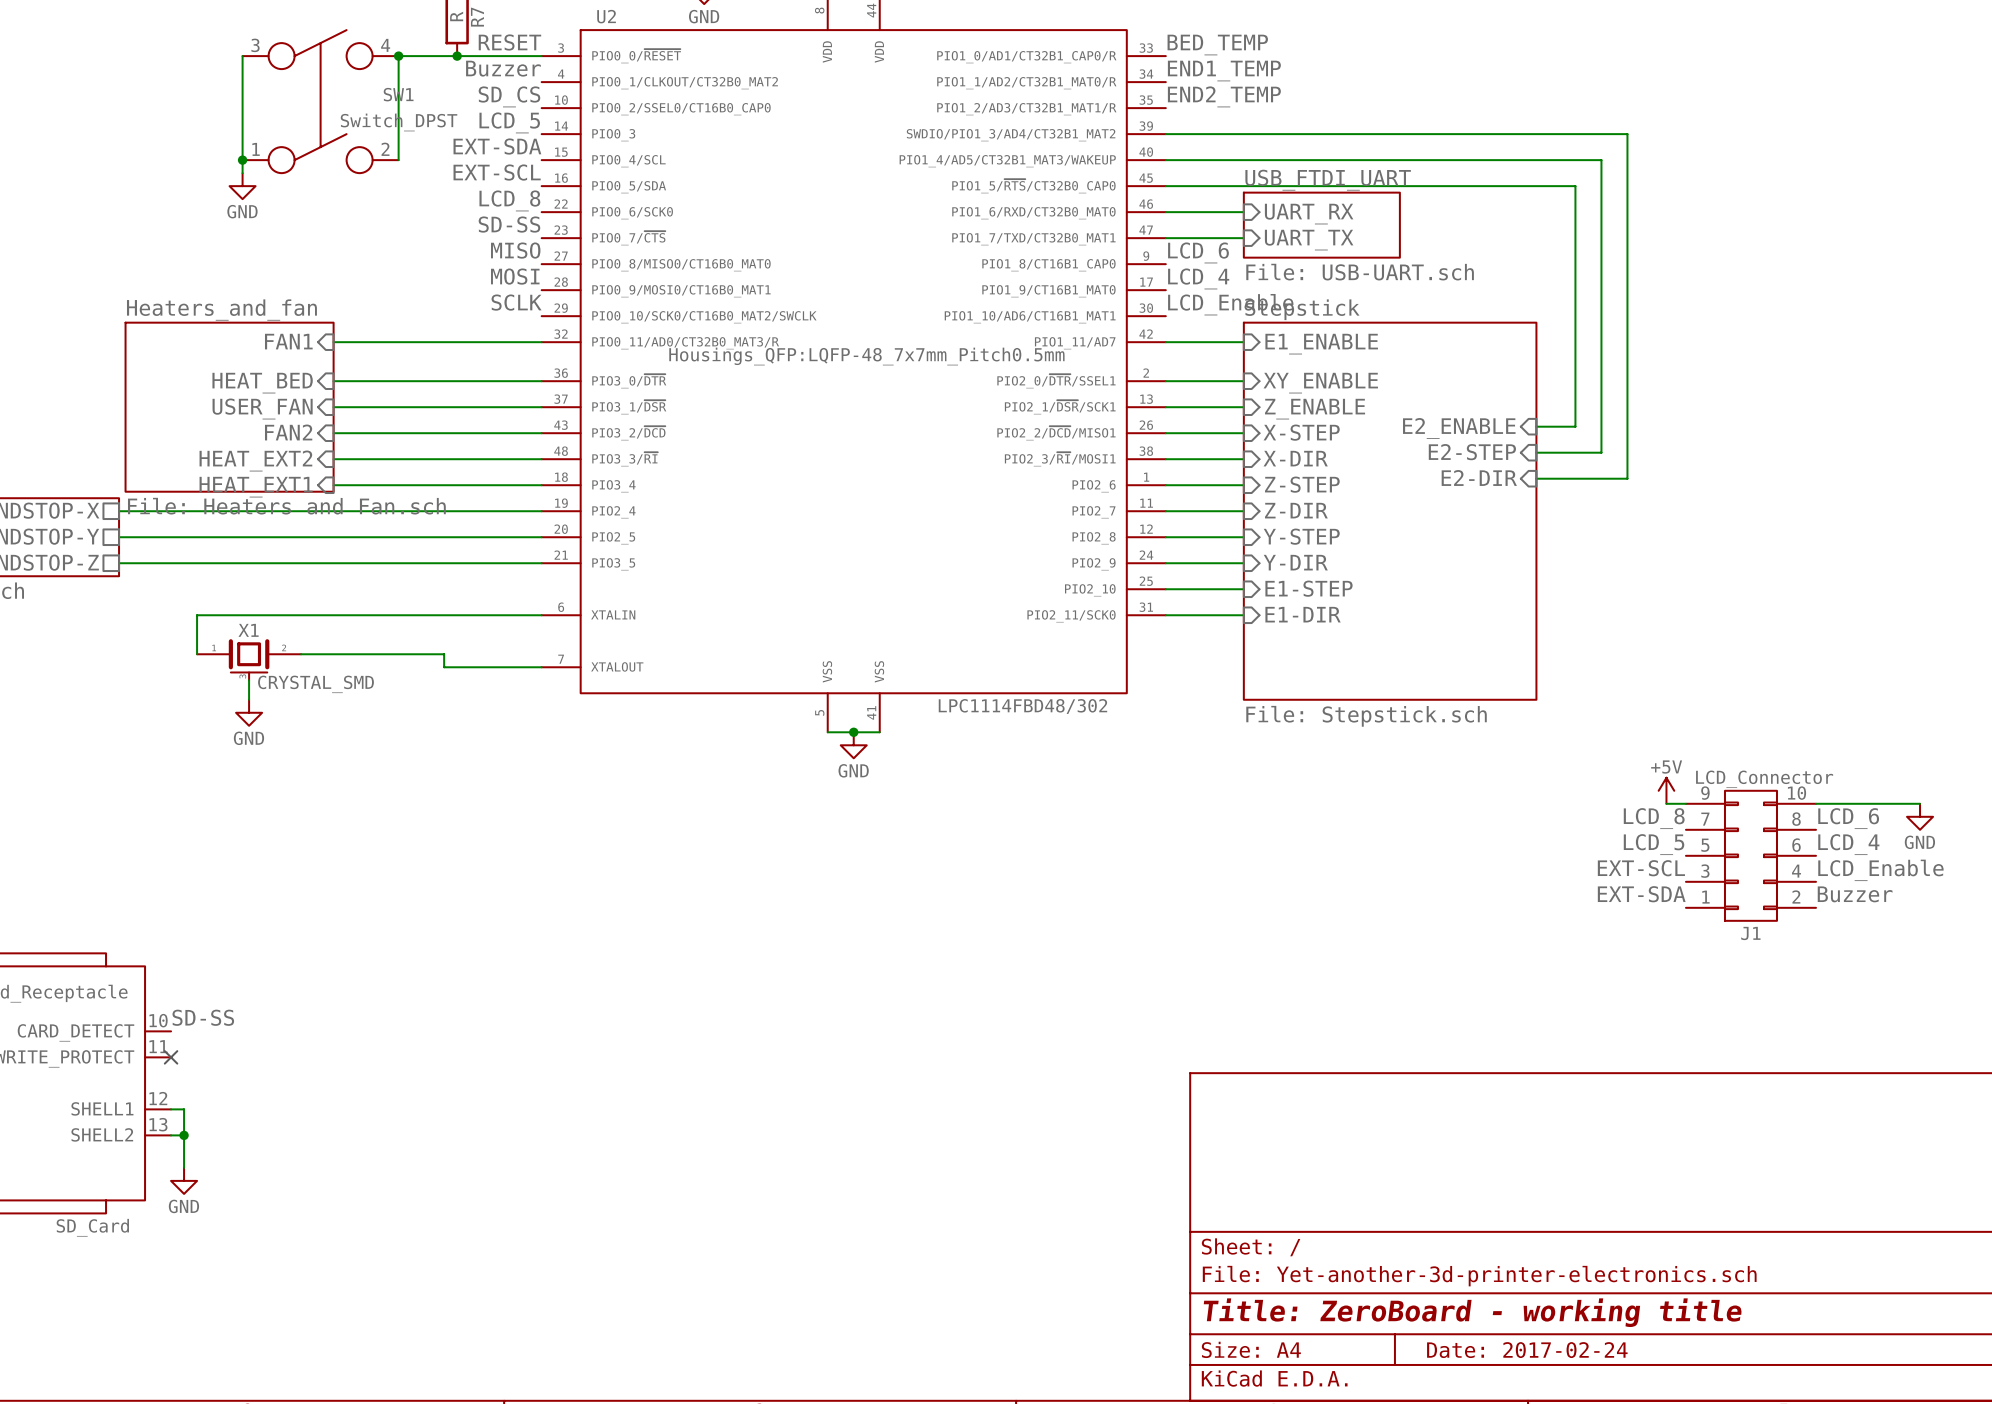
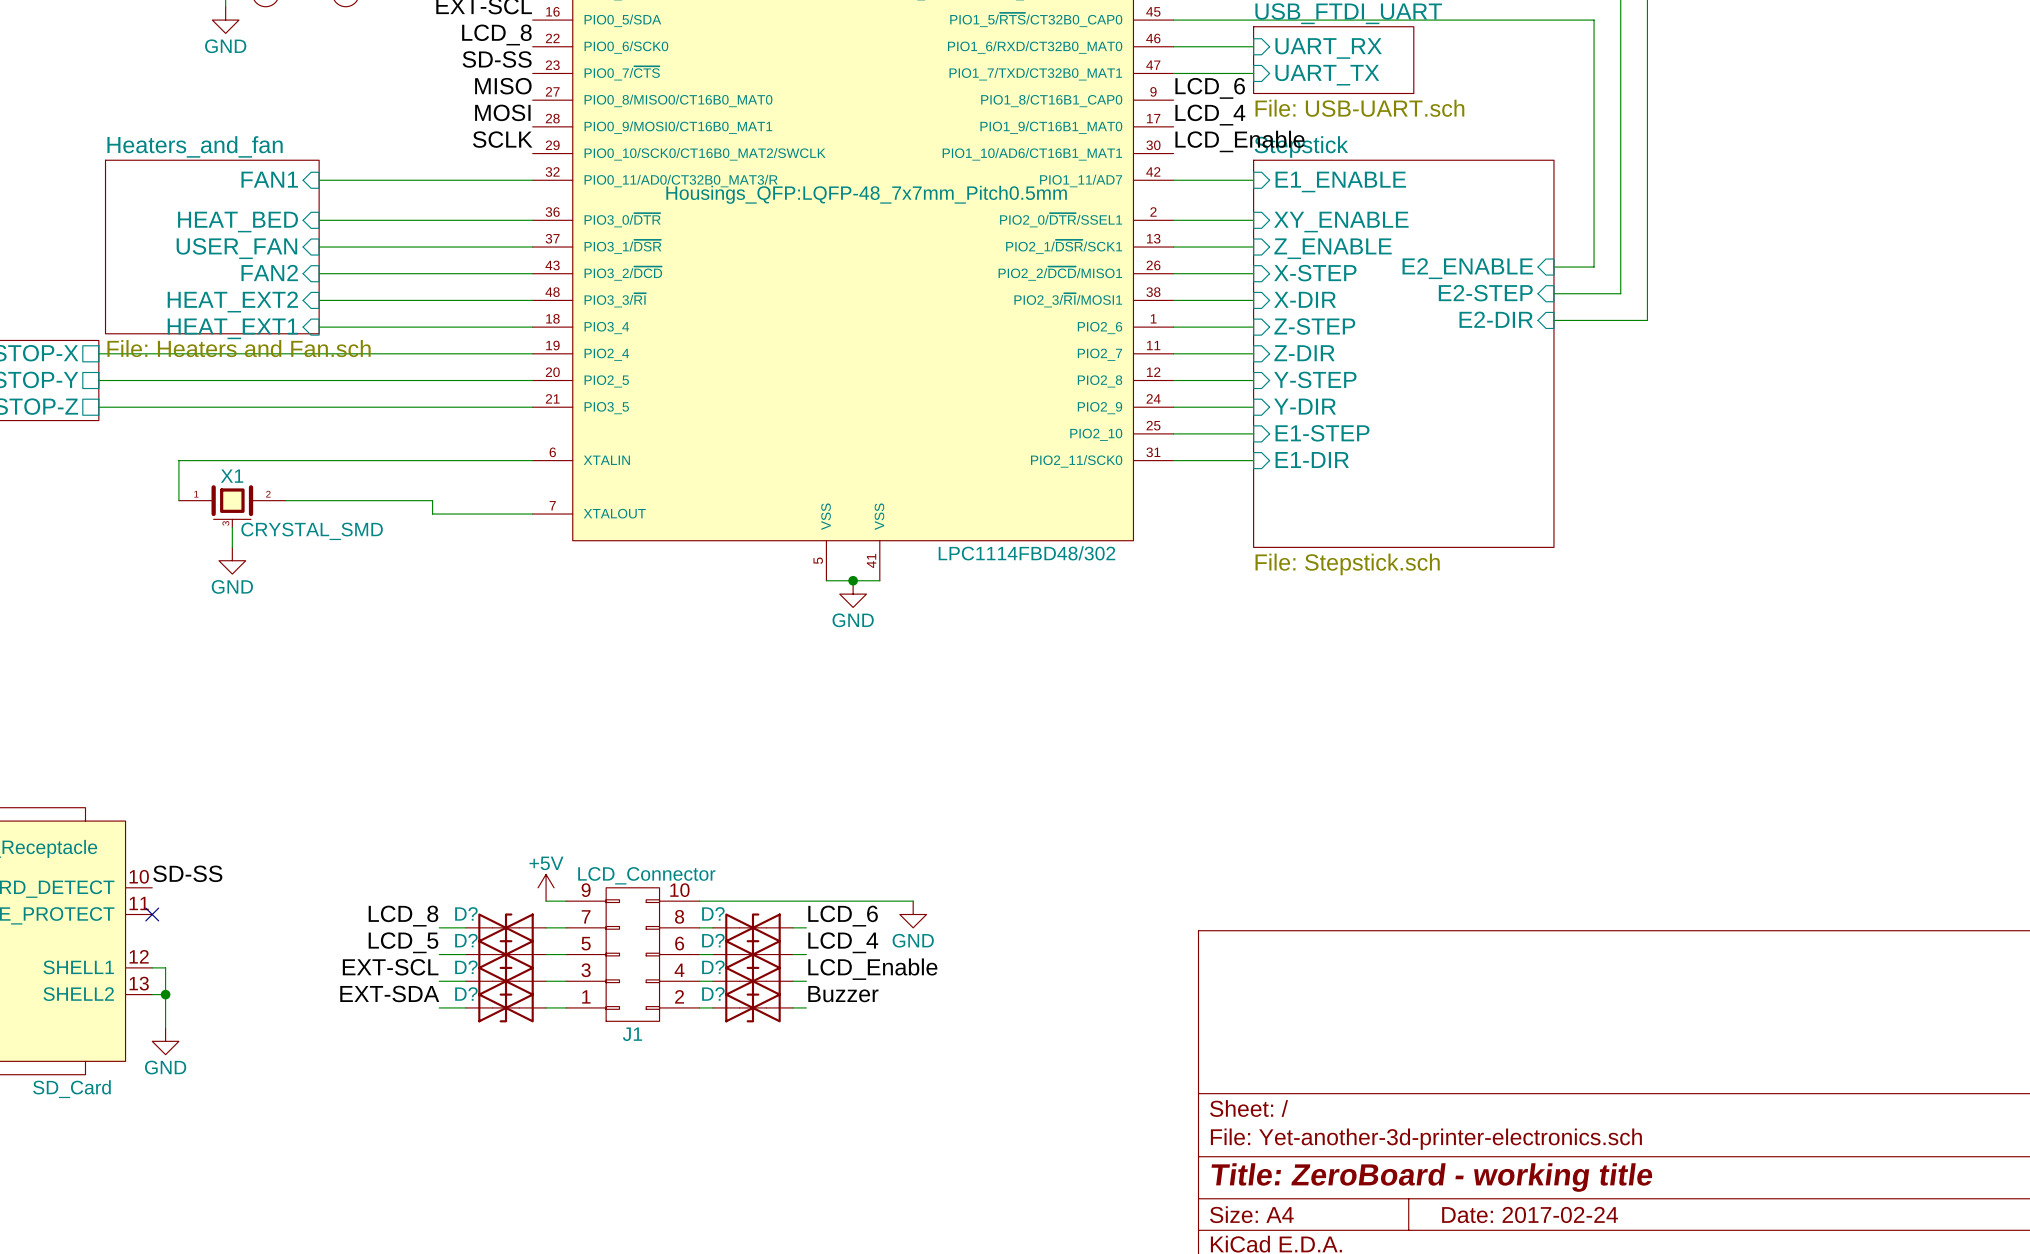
power symbol: +5V (1666, 790) -> none
wire: (1666, 803) (1685, 803) -> none
wire: (1816, 803) (1920, 803) -> none
power symbol: GND (1920, 816) -> none
label: LCD_8 (1654, 818) -> none
label: LCD_6 (1848, 818) -> none
label: LCD_5 (1654, 844) -> none
label: LCD_4 (1848, 844) -> none
J1 position: (1750, 855) -> (632, 954)
label: EXT-SCL (1641, 868) -> none
label: LCD_Enable (1880, 870) -> none
label: EXT-SDA (1641, 894) -> none
label: Buzzer (1855, 894) -> none
power symbol: none -> +5V (546, 887)
wire: none -> (546, 901) (566, 901)
wire: none -> (699, 901) (913, 901)
power symbol: none -> GND (913, 914)
label: none -> LCD_8 (403, 916)
label: none -> LCD_6 (843, 916)
wire: none -> (439, 927) (465, 927)
D?: none -> (506, 927)
wire: none -> (546, 927) (566, 927)
wire: none -> (699, 927) (712, 927)
D?: none -> (752, 927)
wire: none -> (793, 927) (806, 927)
label: none -> LCD_5 (403, 942)
label: none -> LCD_4 (843, 942)
wire: none -> (439, 954) (465, 954)
D?: none -> (506, 954)
wire: none -> (546, 954) (566, 954)
wire: none -> (699, 954) (712, 954)
D?: none -> (752, 954)
wire: none -> (793, 954) (806, 954)
label: none -> EXT-SCL (390, 967)
label: none -> LCD_Enable (872, 969)
wire: none -> (439, 981) (465, 981)
D?: none -> (506, 981)
wire: none -> (546, 981) (566, 981)
wire: none -> (699, 981) (712, 981)
D?: none -> (752, 981)
wire: none -> (793, 981) (806, 981)
label: none -> EXT-SDA (389, 993)
label: none -> Buzzer (843, 994)
wire: none -> (439, 1007) (465, 1007)
D?: none -> (506, 1007)
wire: none -> (546, 1007) (566, 1007)
wire: none -> (699, 1007) (712, 1007)
D?: none -> (752, 1007)
wire: none -> (793, 1007) (806, 1007)

